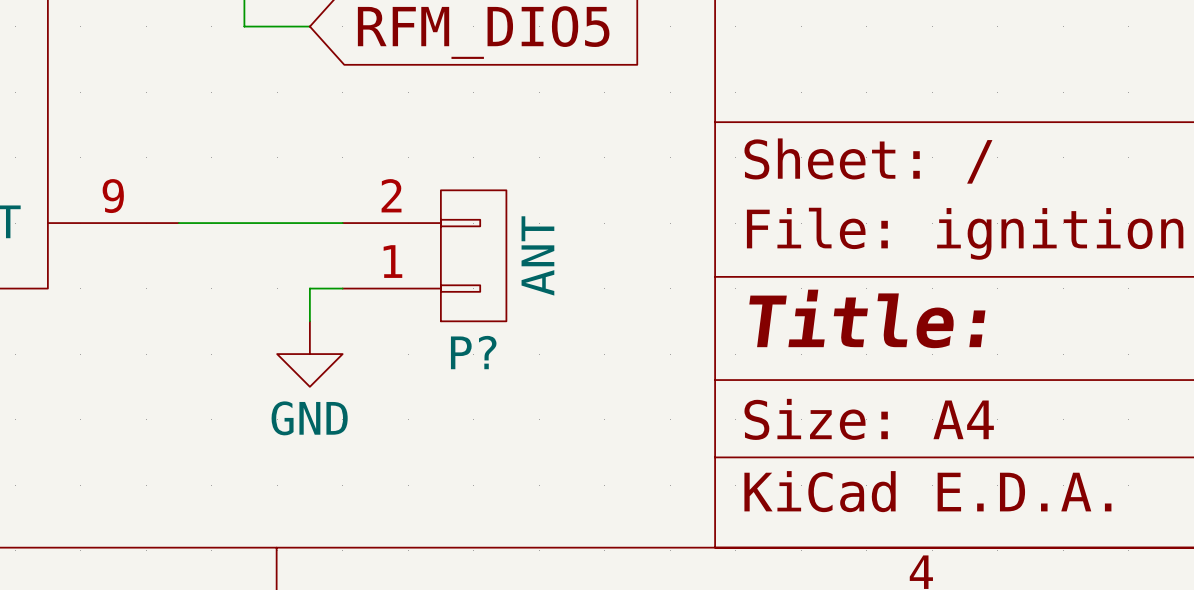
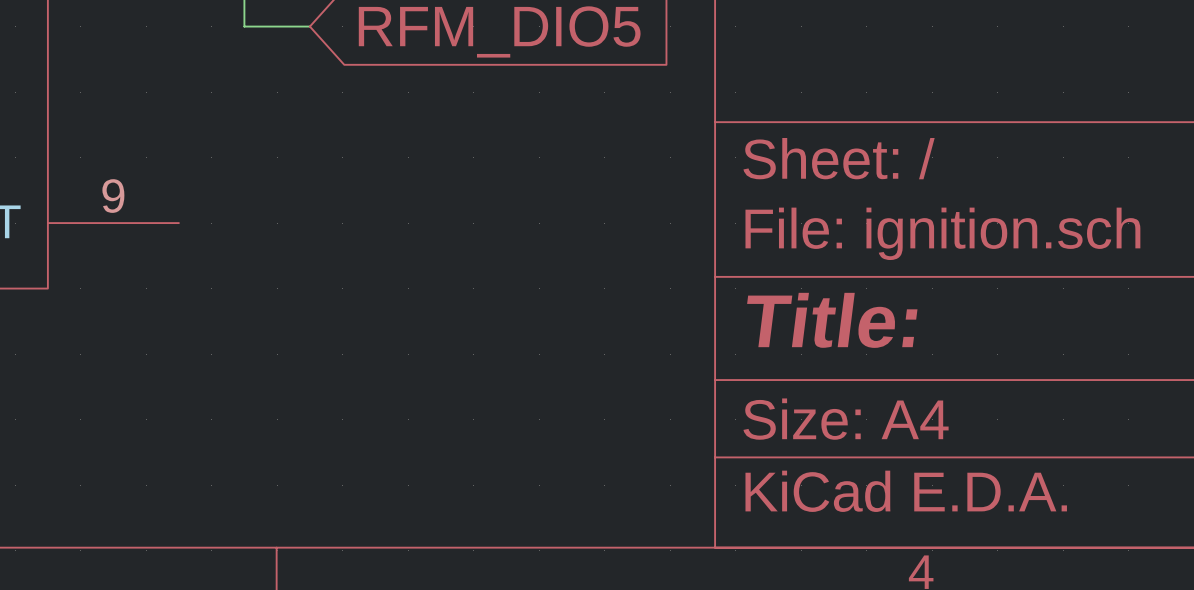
wire: (178, 223) (342, 223) -> none
P?: ANT (424, 255) -> none
wire: (342, 288) (309, 288) (309, 321) -> none
power symbol: GND (309, 354) -> none

